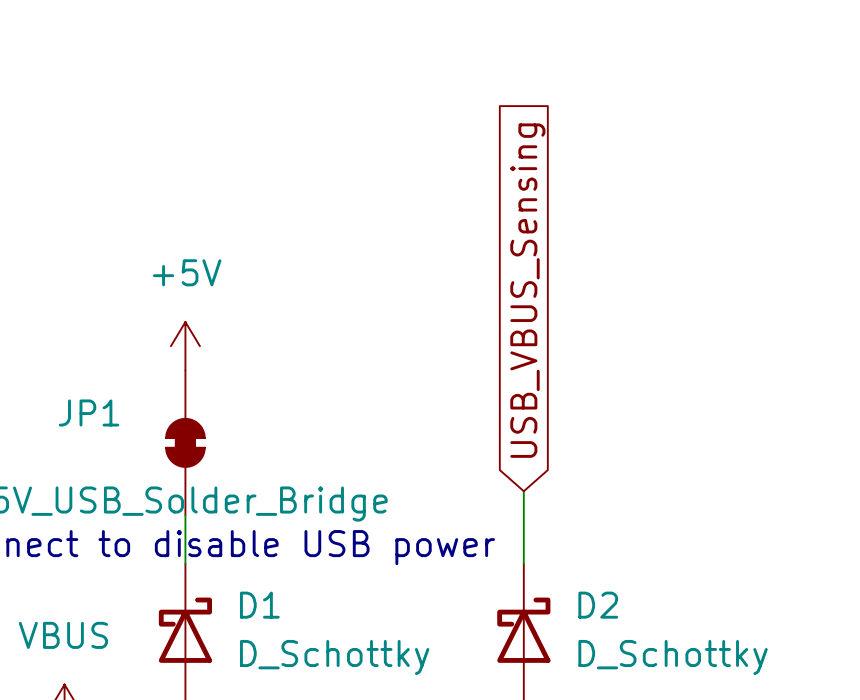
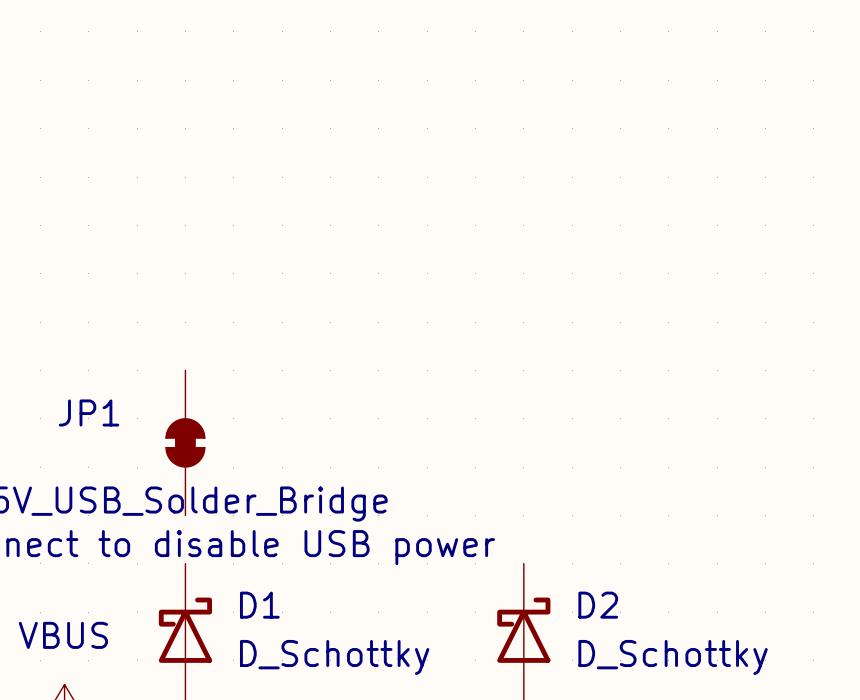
global label: USB_VBUS_Sensing (527, 290) -> none
power symbol: +5V (185, 346) -> none
wire: (523, 491) (523, 563) -> none
wire: (185, 515) (185, 563) -> none

